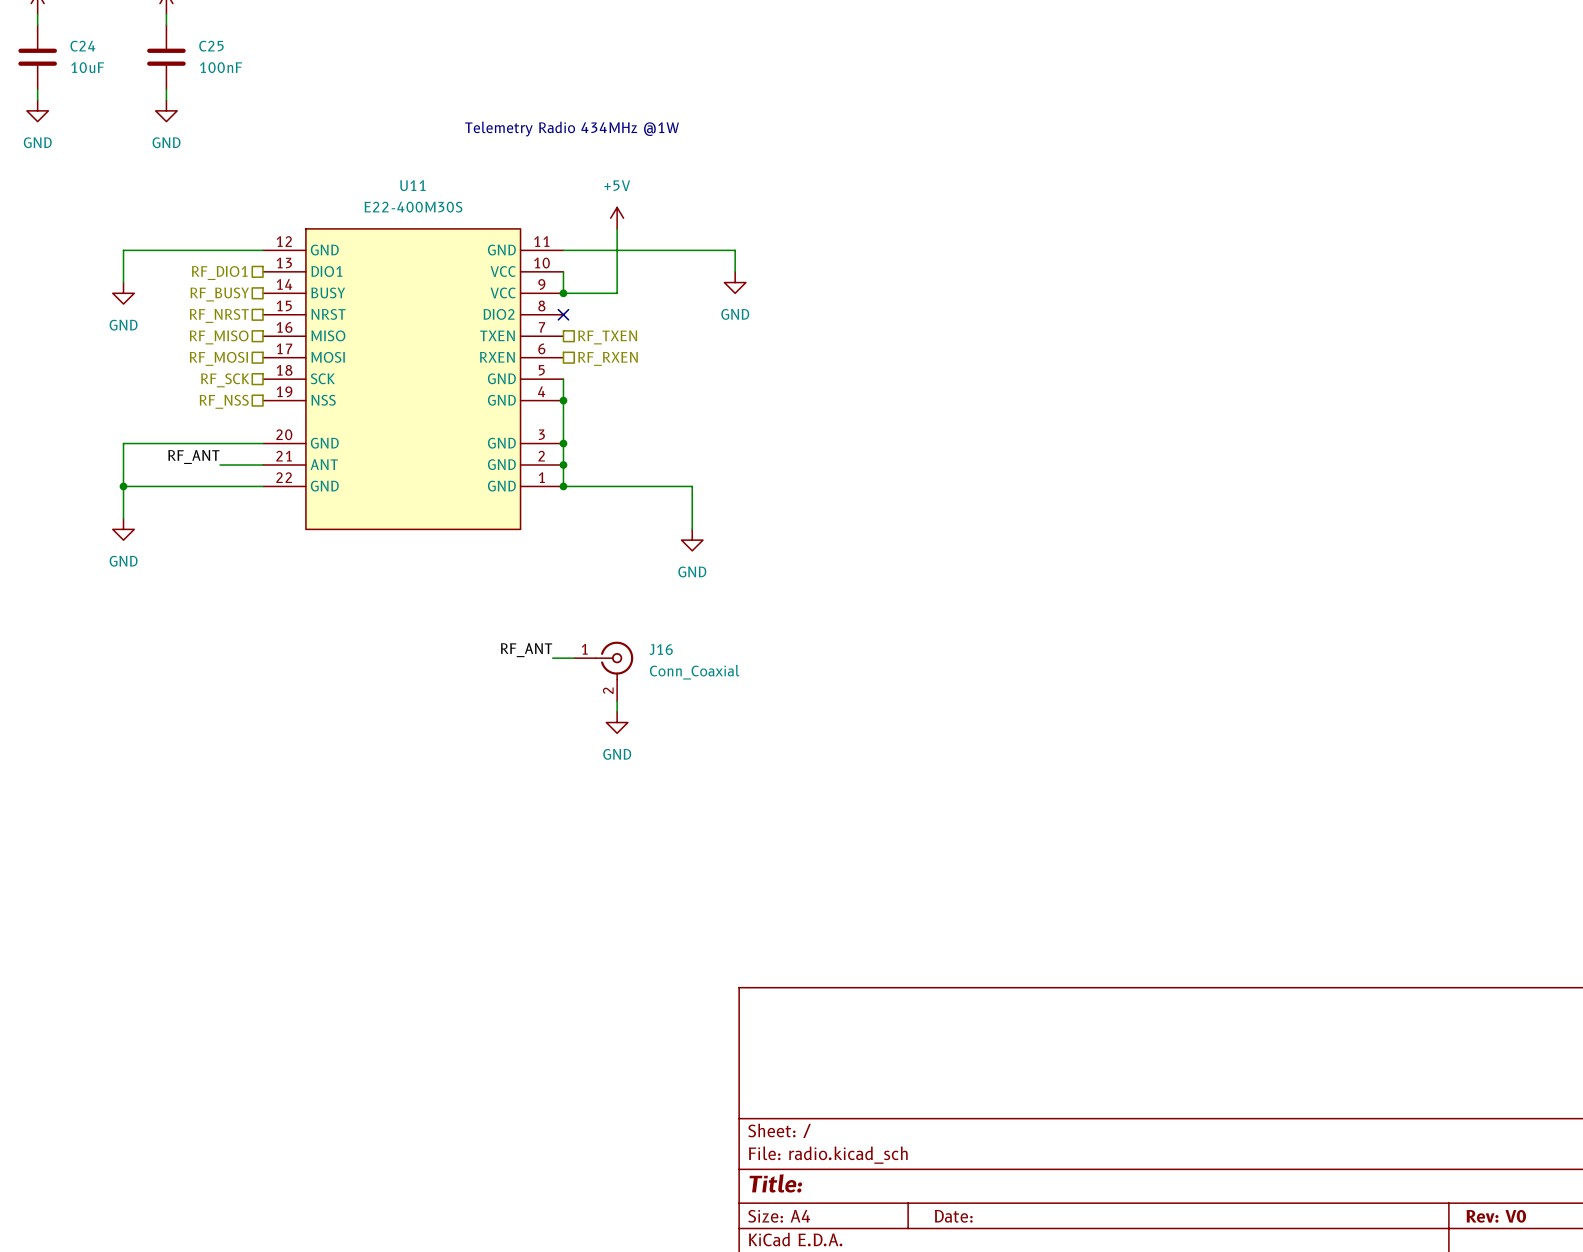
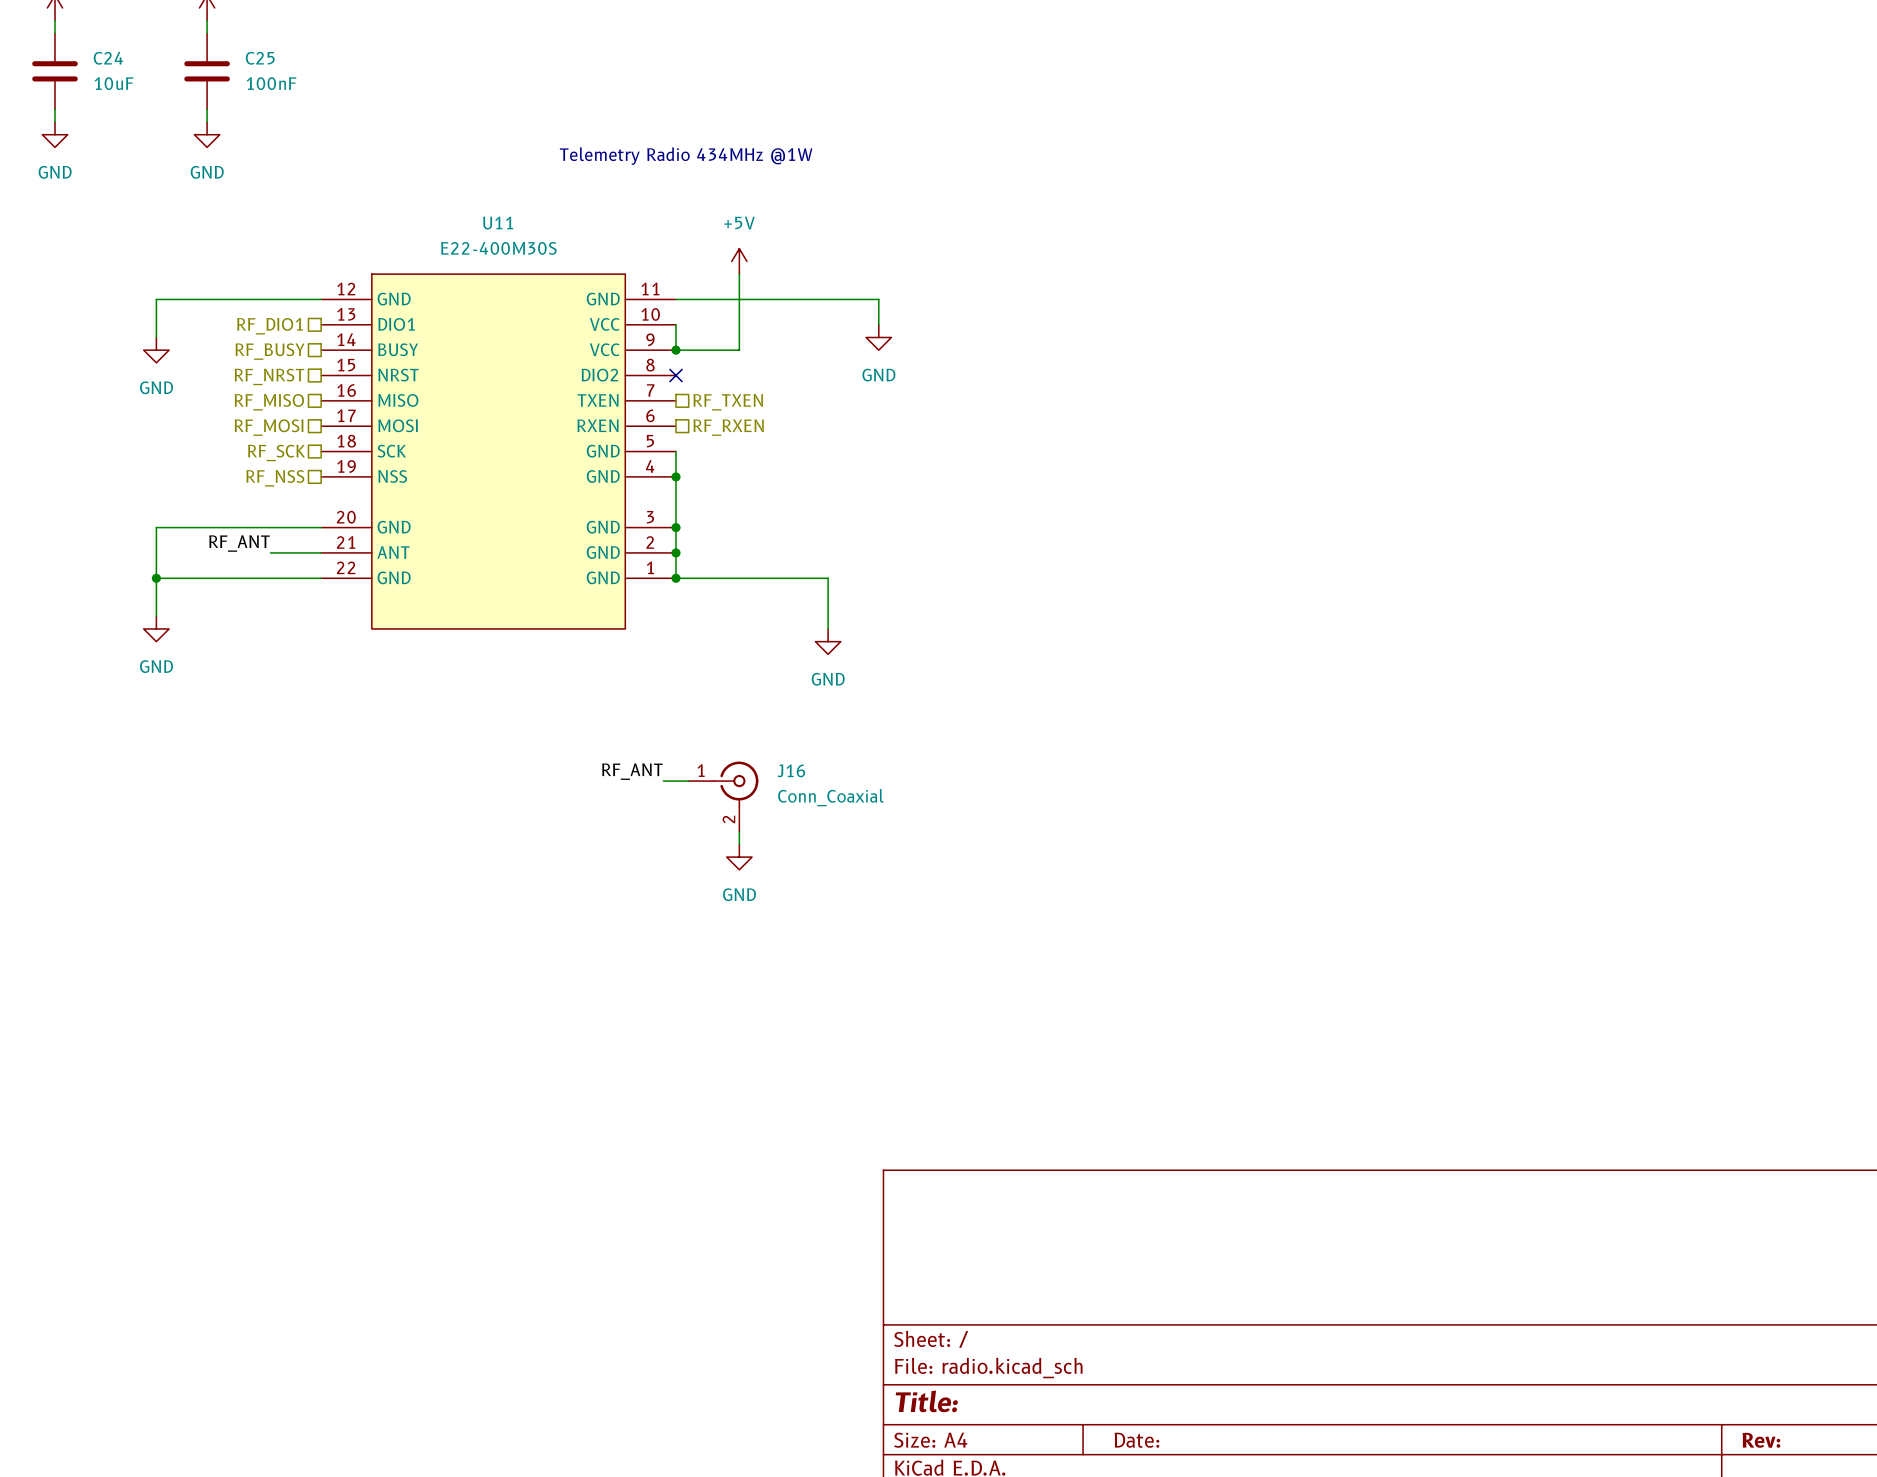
title block: Rev: V0 (1496, 1216) -> Rev: (1761, 1440)

